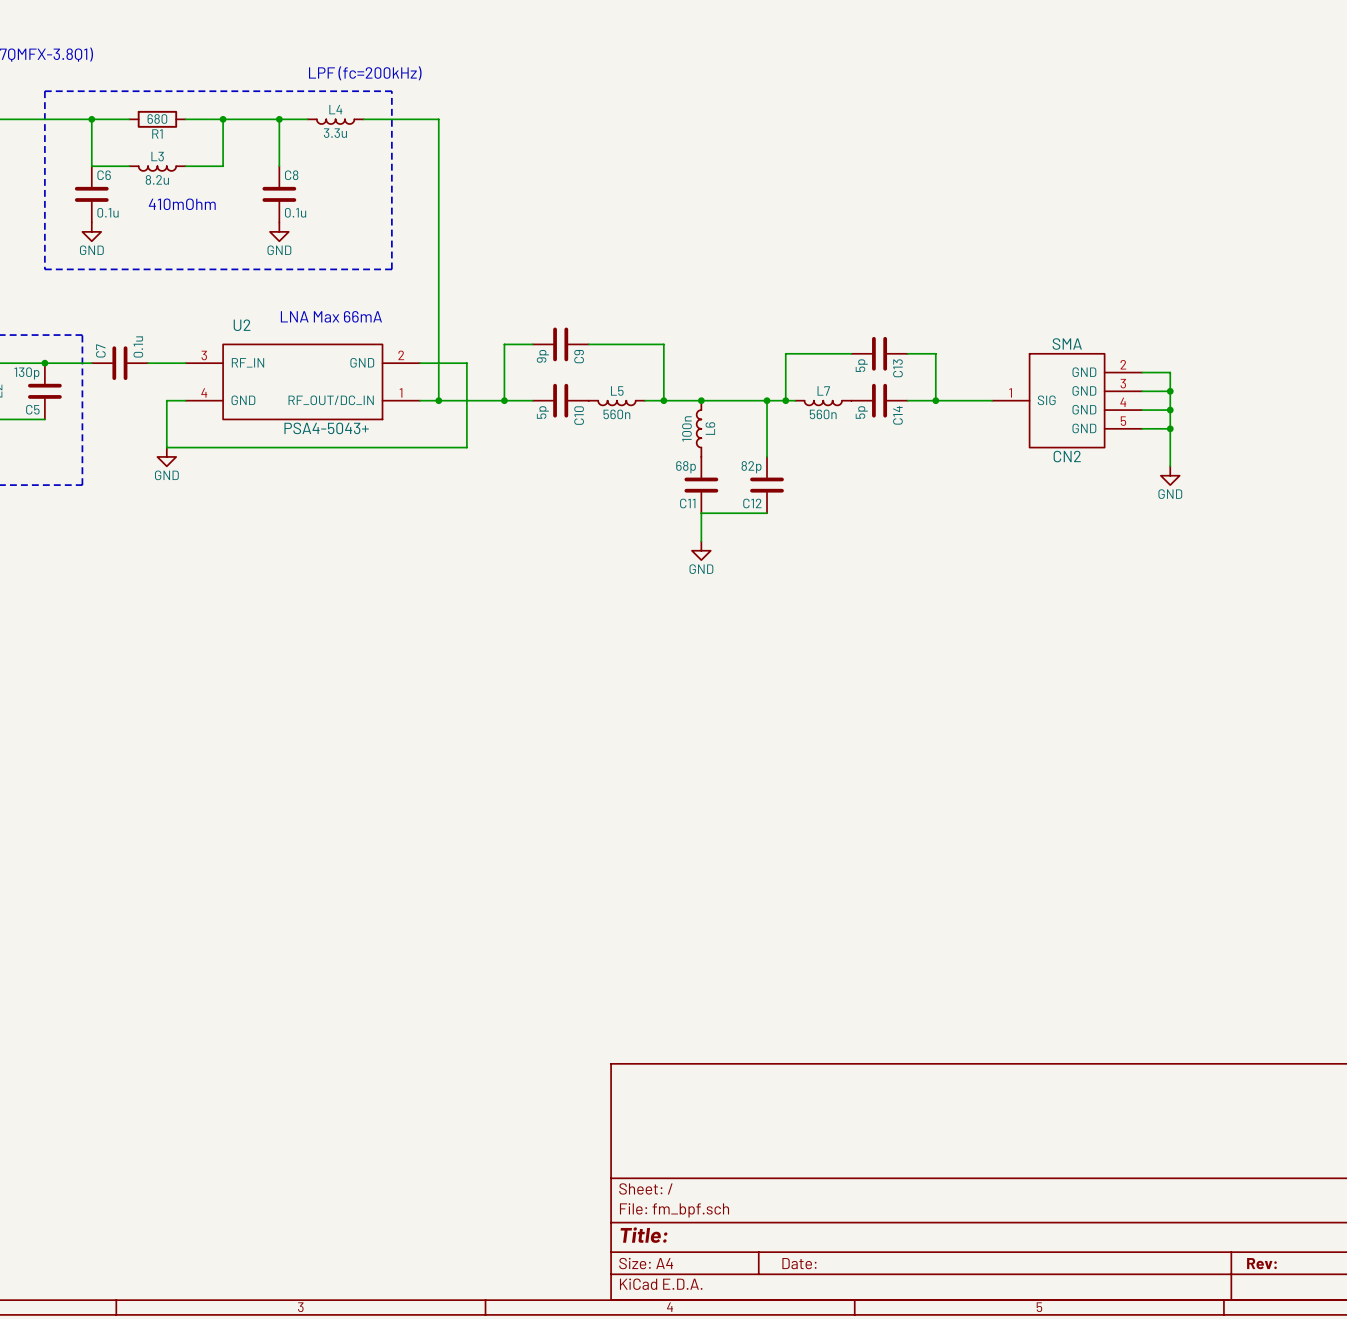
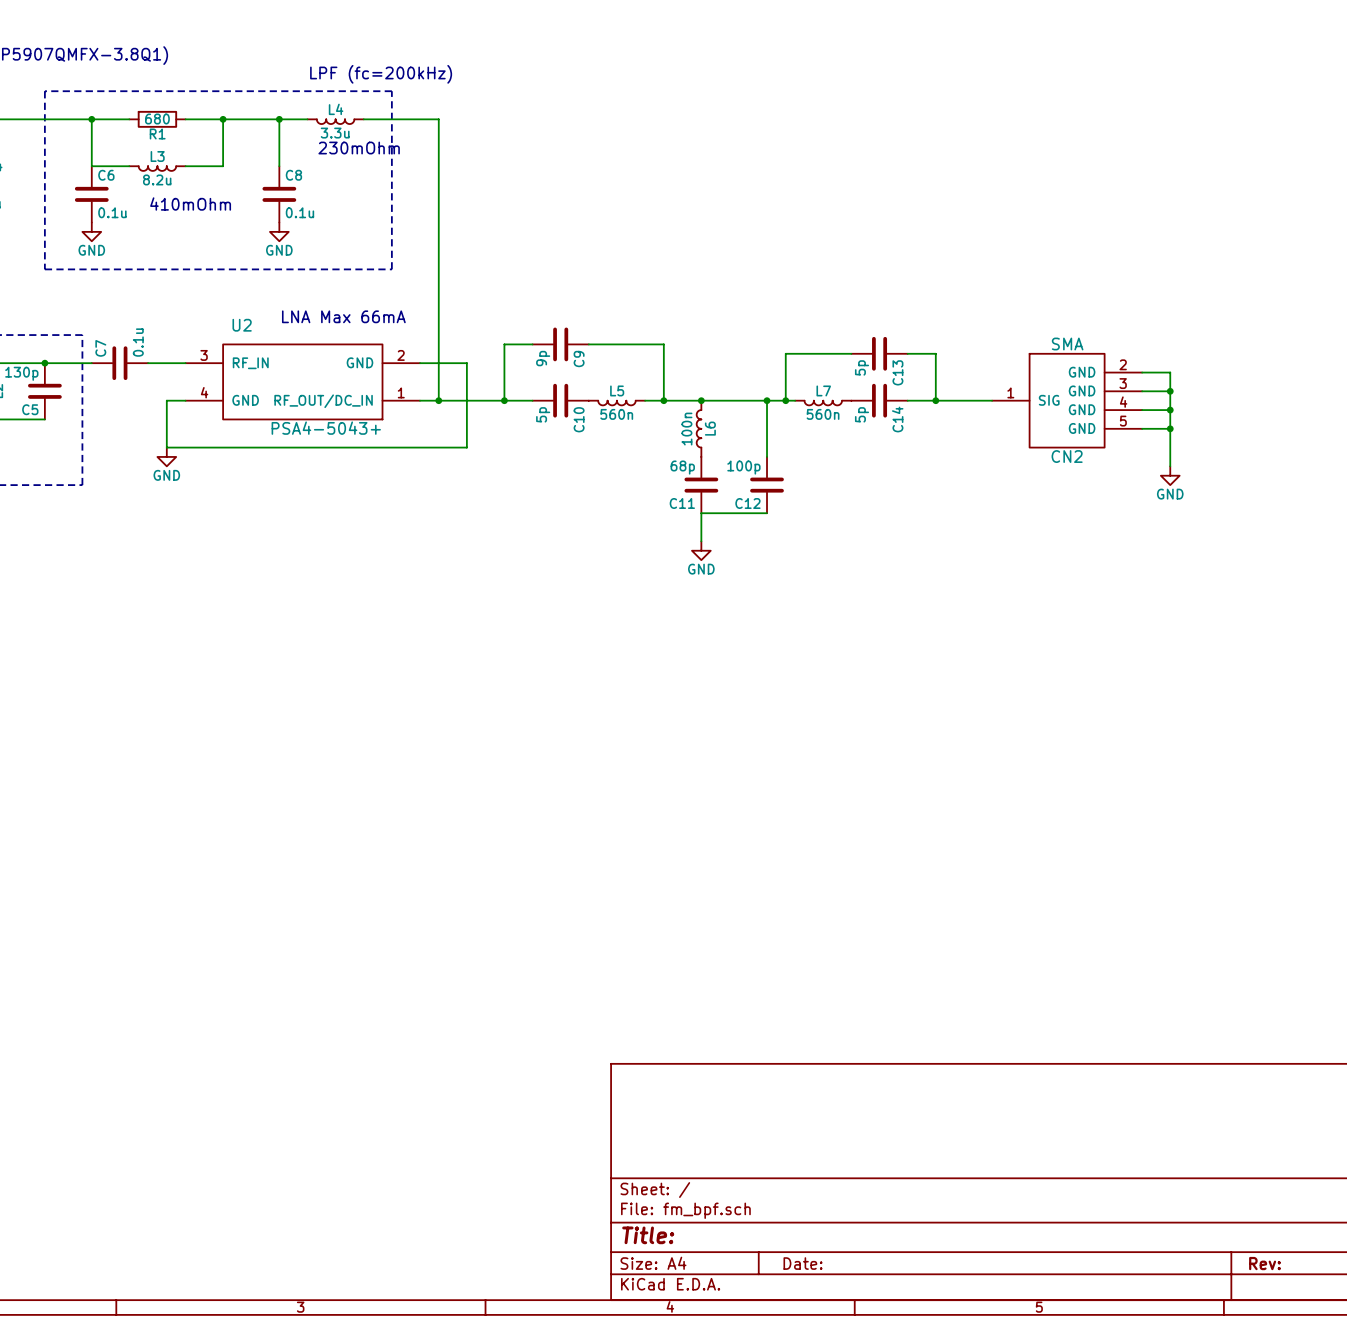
text: none -> 230mOhm (359, 148)
C12 value: 82p (751, 467) -> 100p (743, 467)

